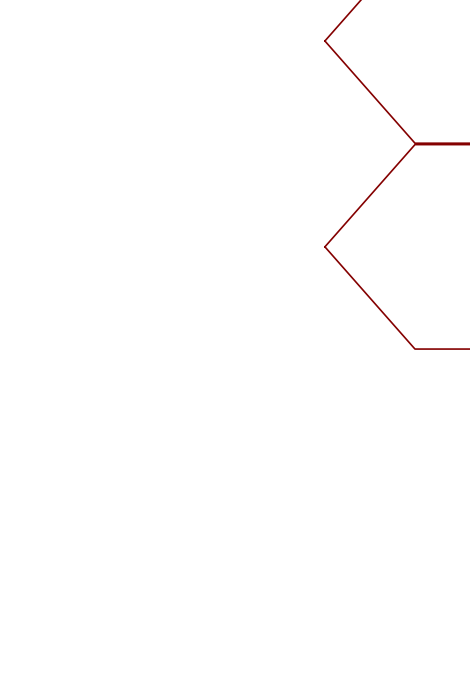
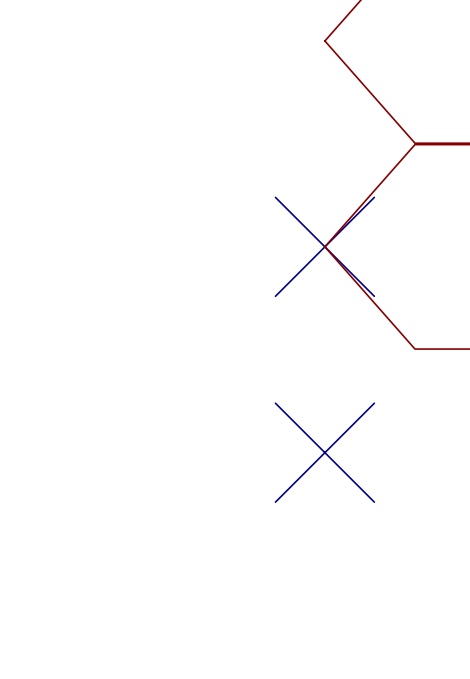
no-connect mark: none -> (324, 246)
no-connect mark: none -> (324, 452)

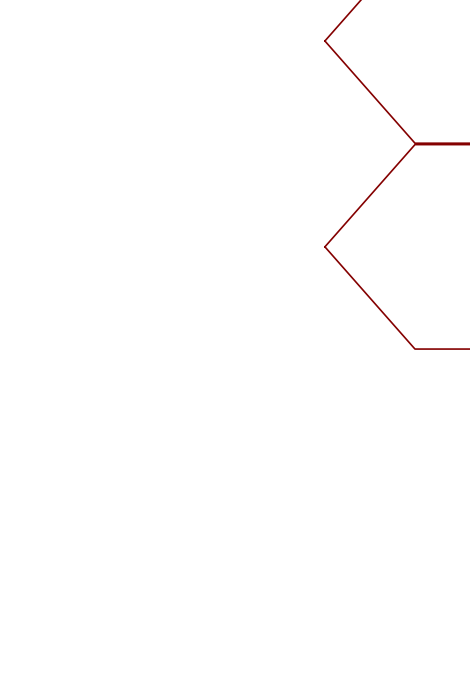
no-connect mark: (324, 246) -> none
no-connect mark: (324, 452) -> none

